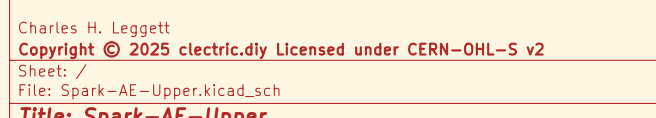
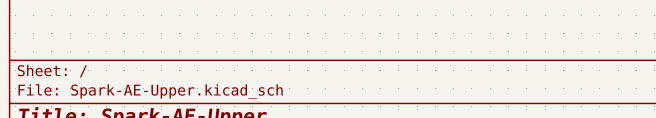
title block: Charles H. Leggett (94, 29) -> none
title block: Copyright © 2025 clectric.diy Licensed under CERN-OHL-S v2 (281, 50) -> none

